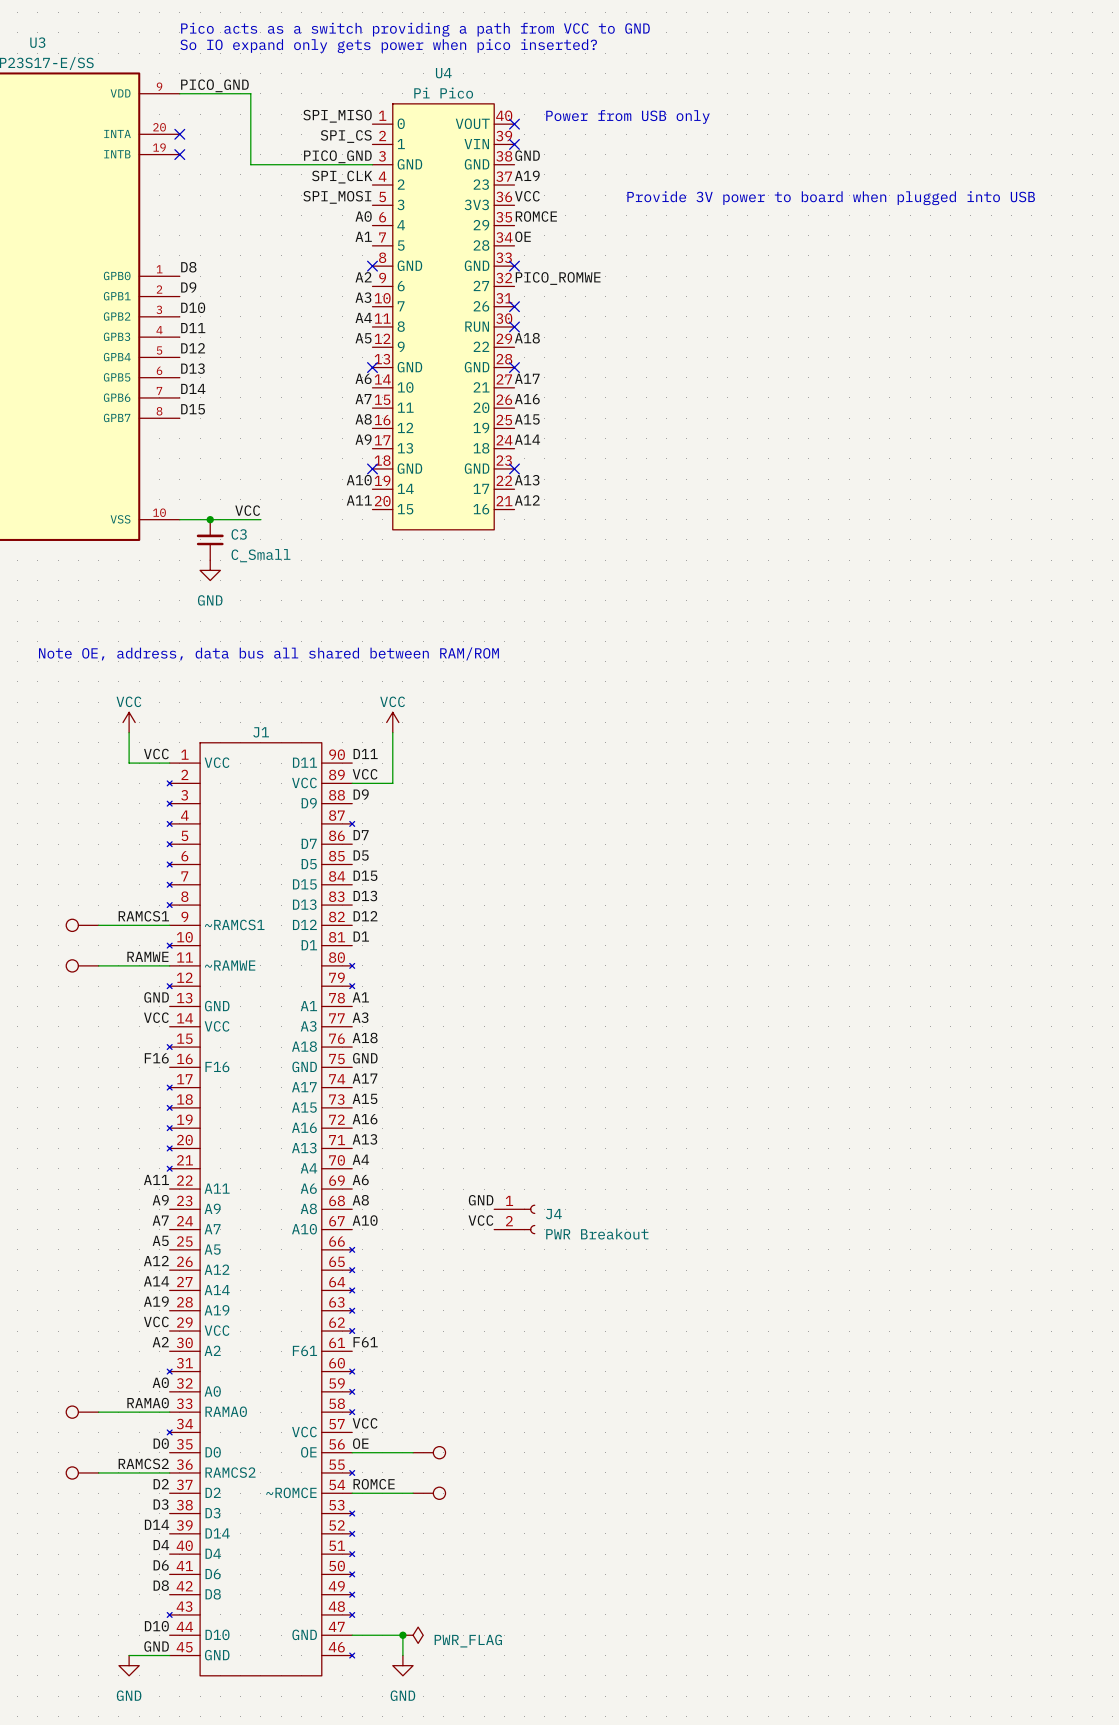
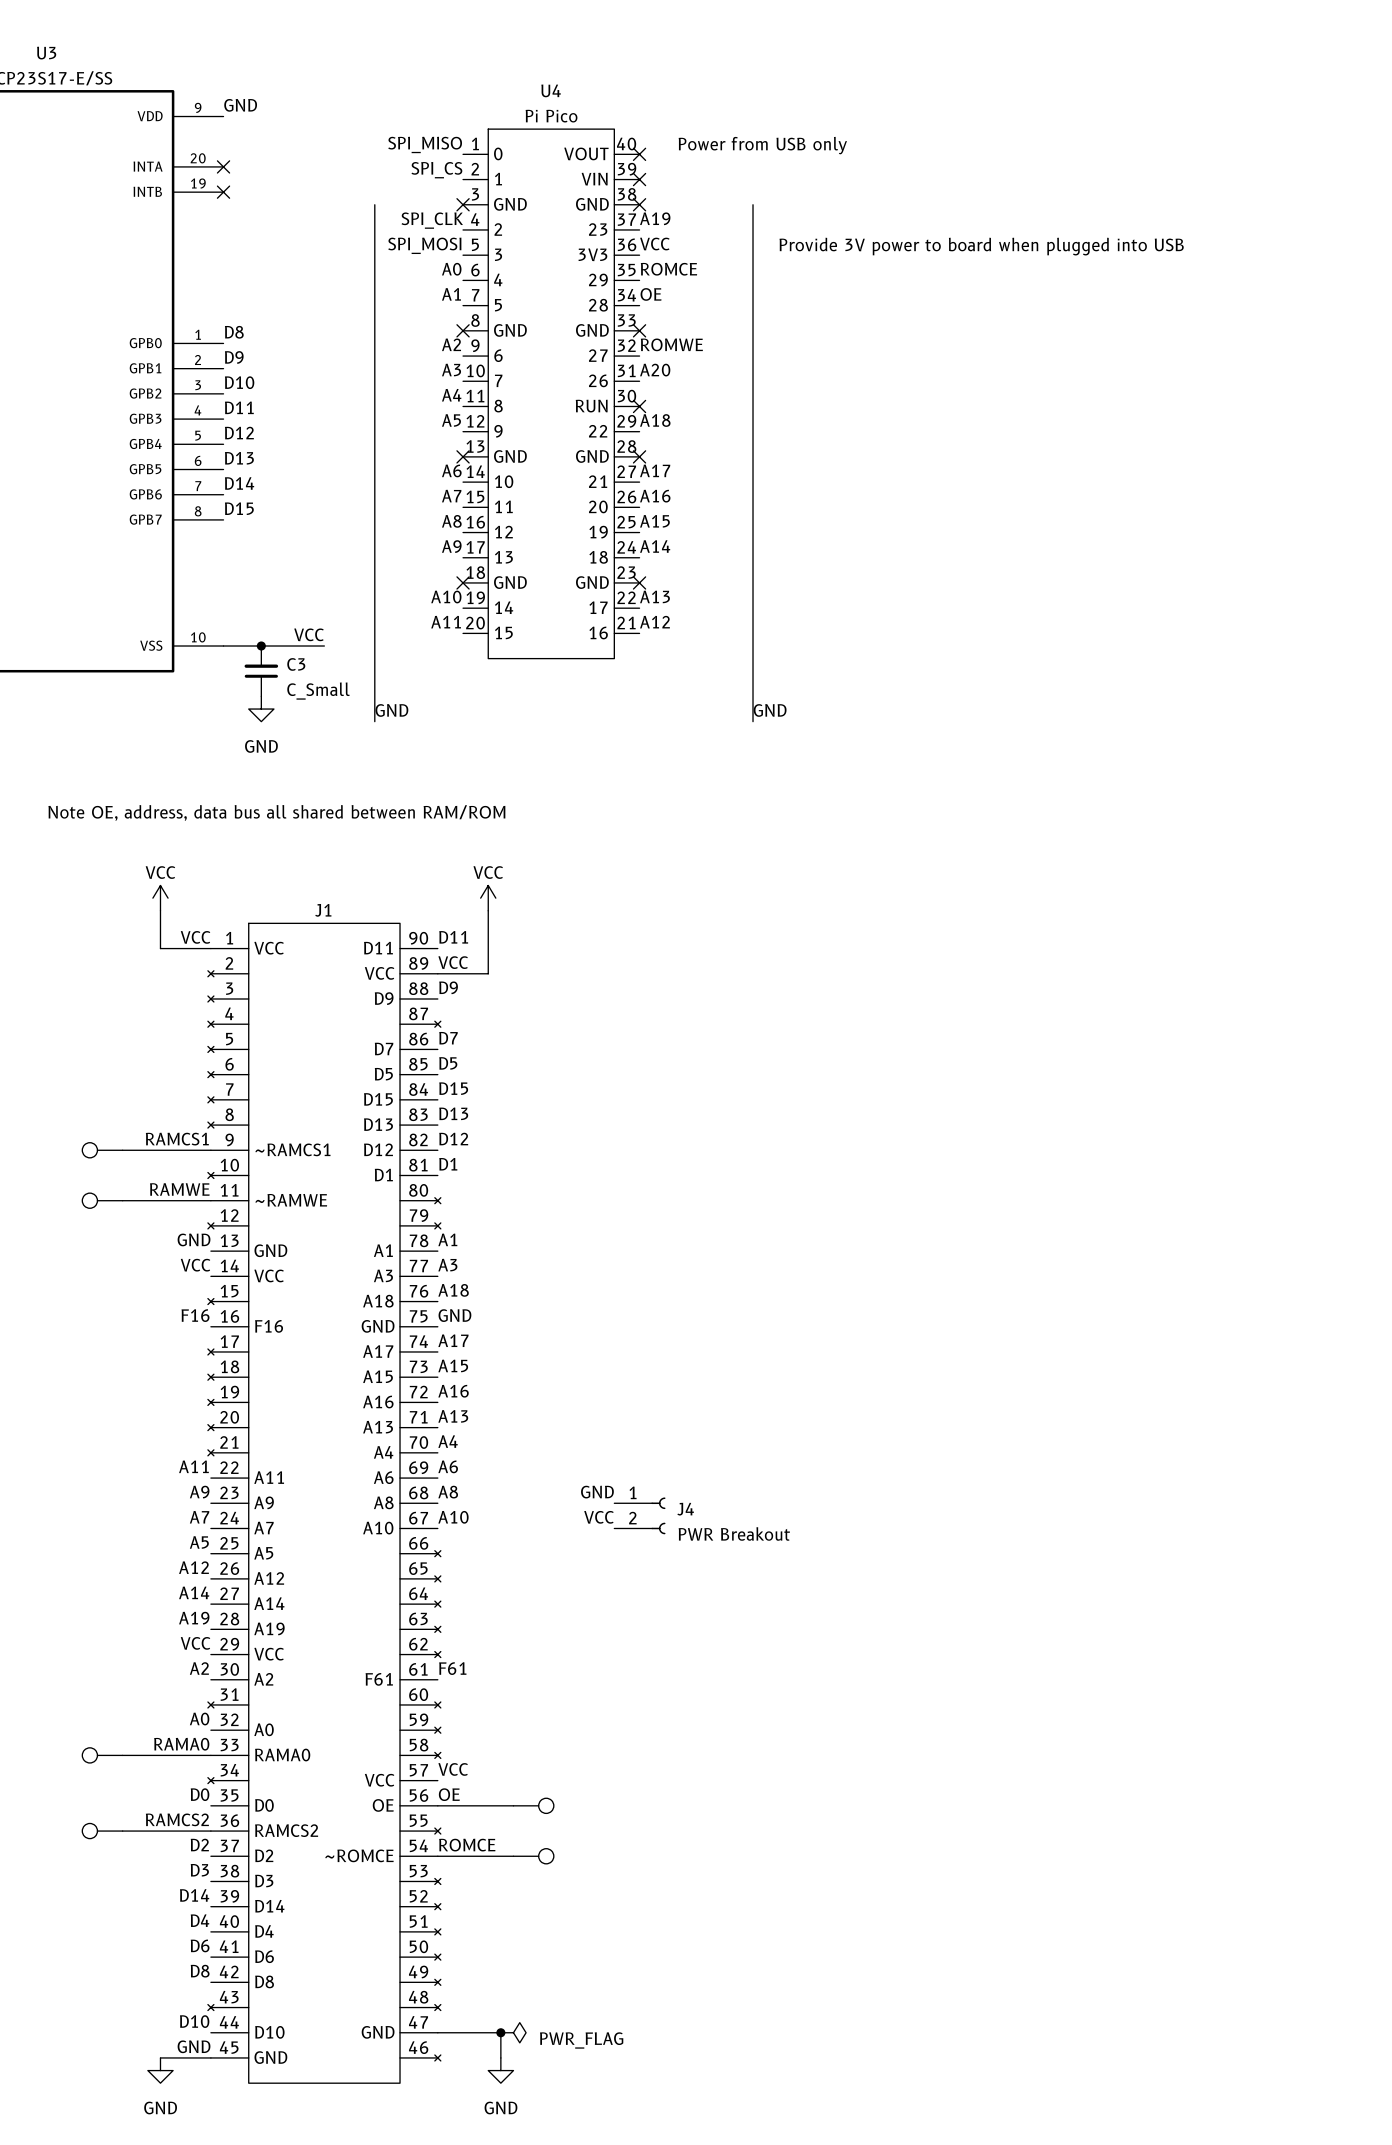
text: Pico acts as a switch providing a path from VCC to GND (415, 29) -> none
text: So IO expand only gets power when pico inserted? (388, 46) -> none
label: PICO_GND (214, 85) -> GND (240, 105)
wire: (179, 93) (250, 93) (250, 164) (372, 164) -> none
label: GND (527, 155) -> none
label: PICO_GND (337, 156) -> none
wire: none -> (374, 204) (374, 721)
no-connect mark: none -> (463, 204)
no-connect mark: none -> (639, 204)
wire: none -> (753, 204) (753, 721)
label: PICO_ROMWE (558, 278) -> ROMWE (671, 344)
label: none -> A20 (655, 370)
no-connect mark: (514, 306) -> none
label: none -> GND (391, 710)
label: none -> GND (770, 710)

